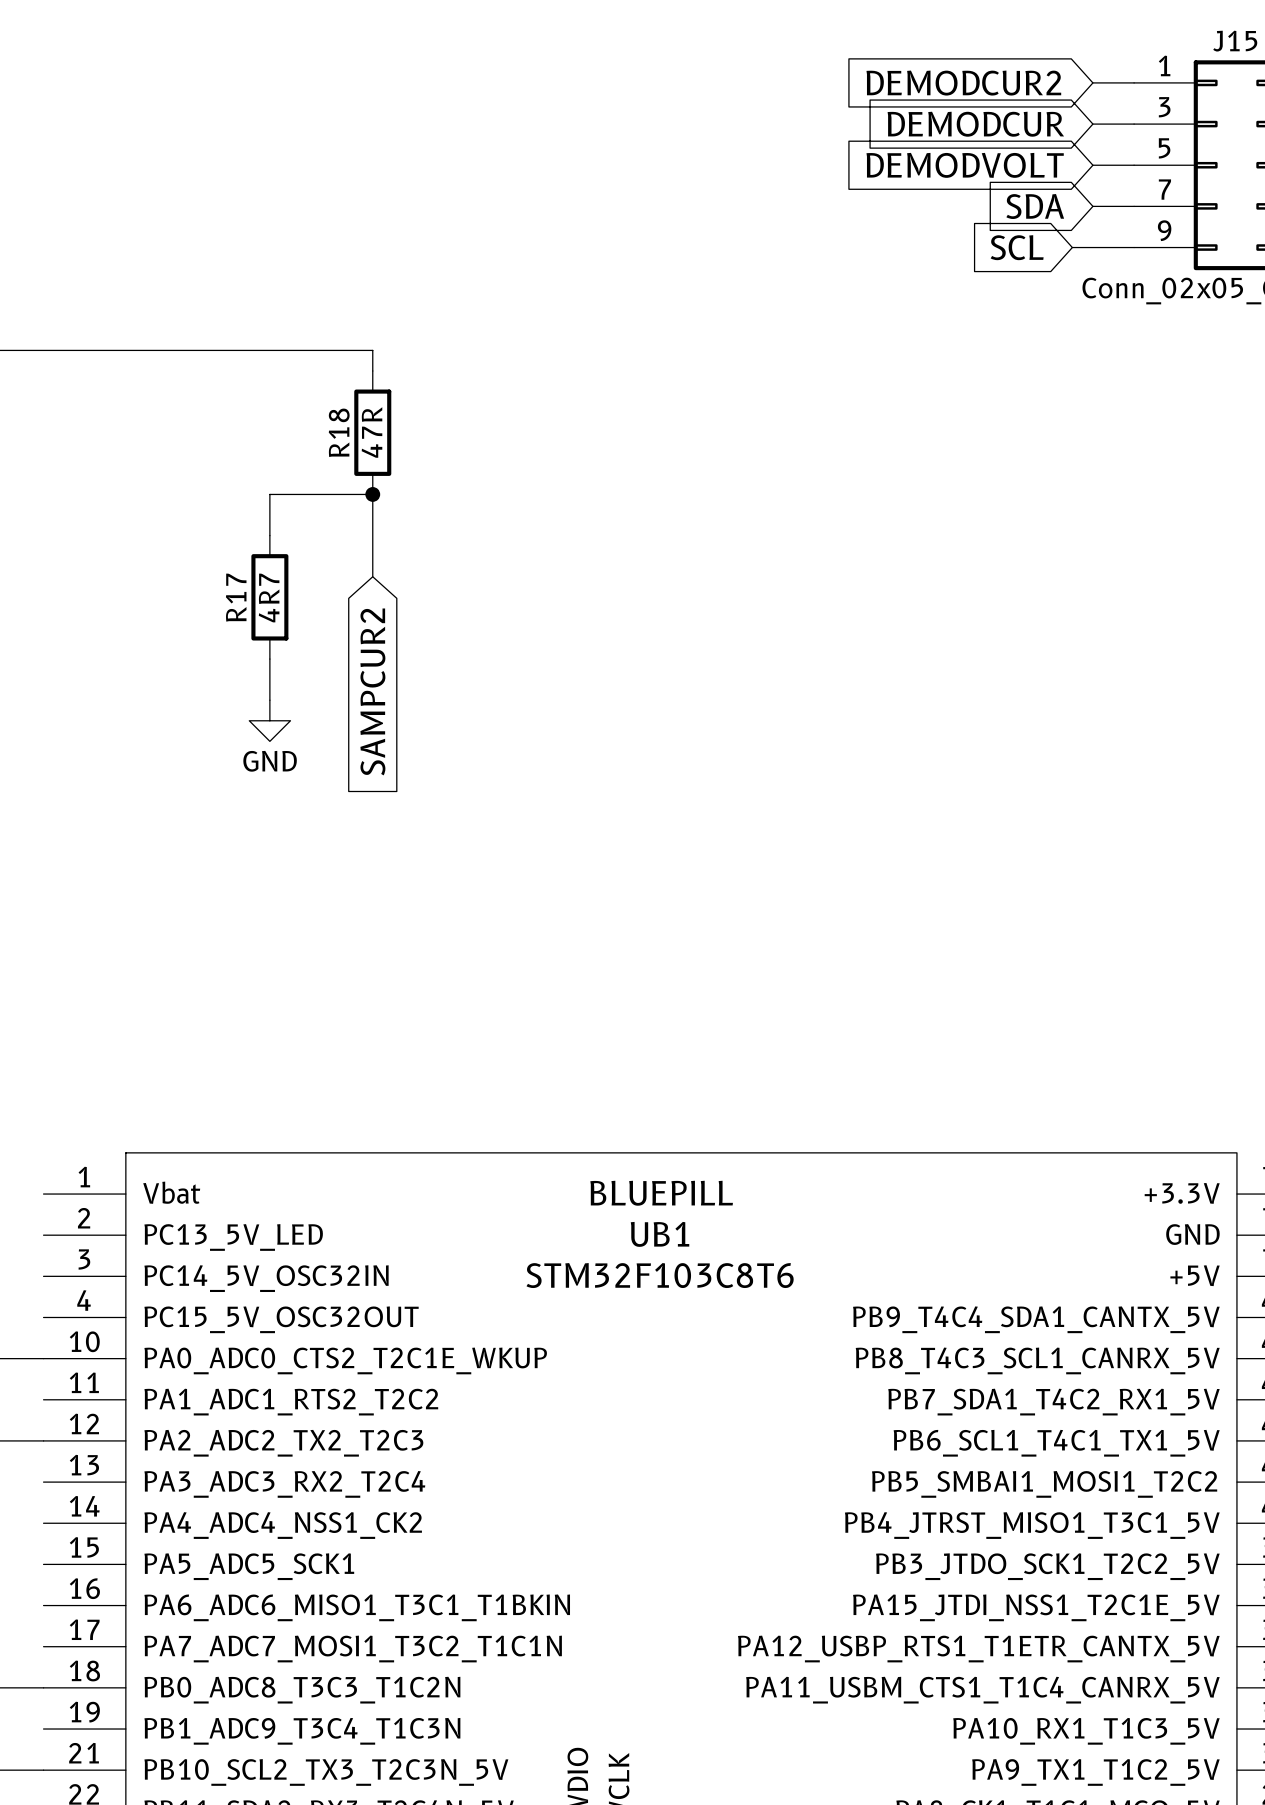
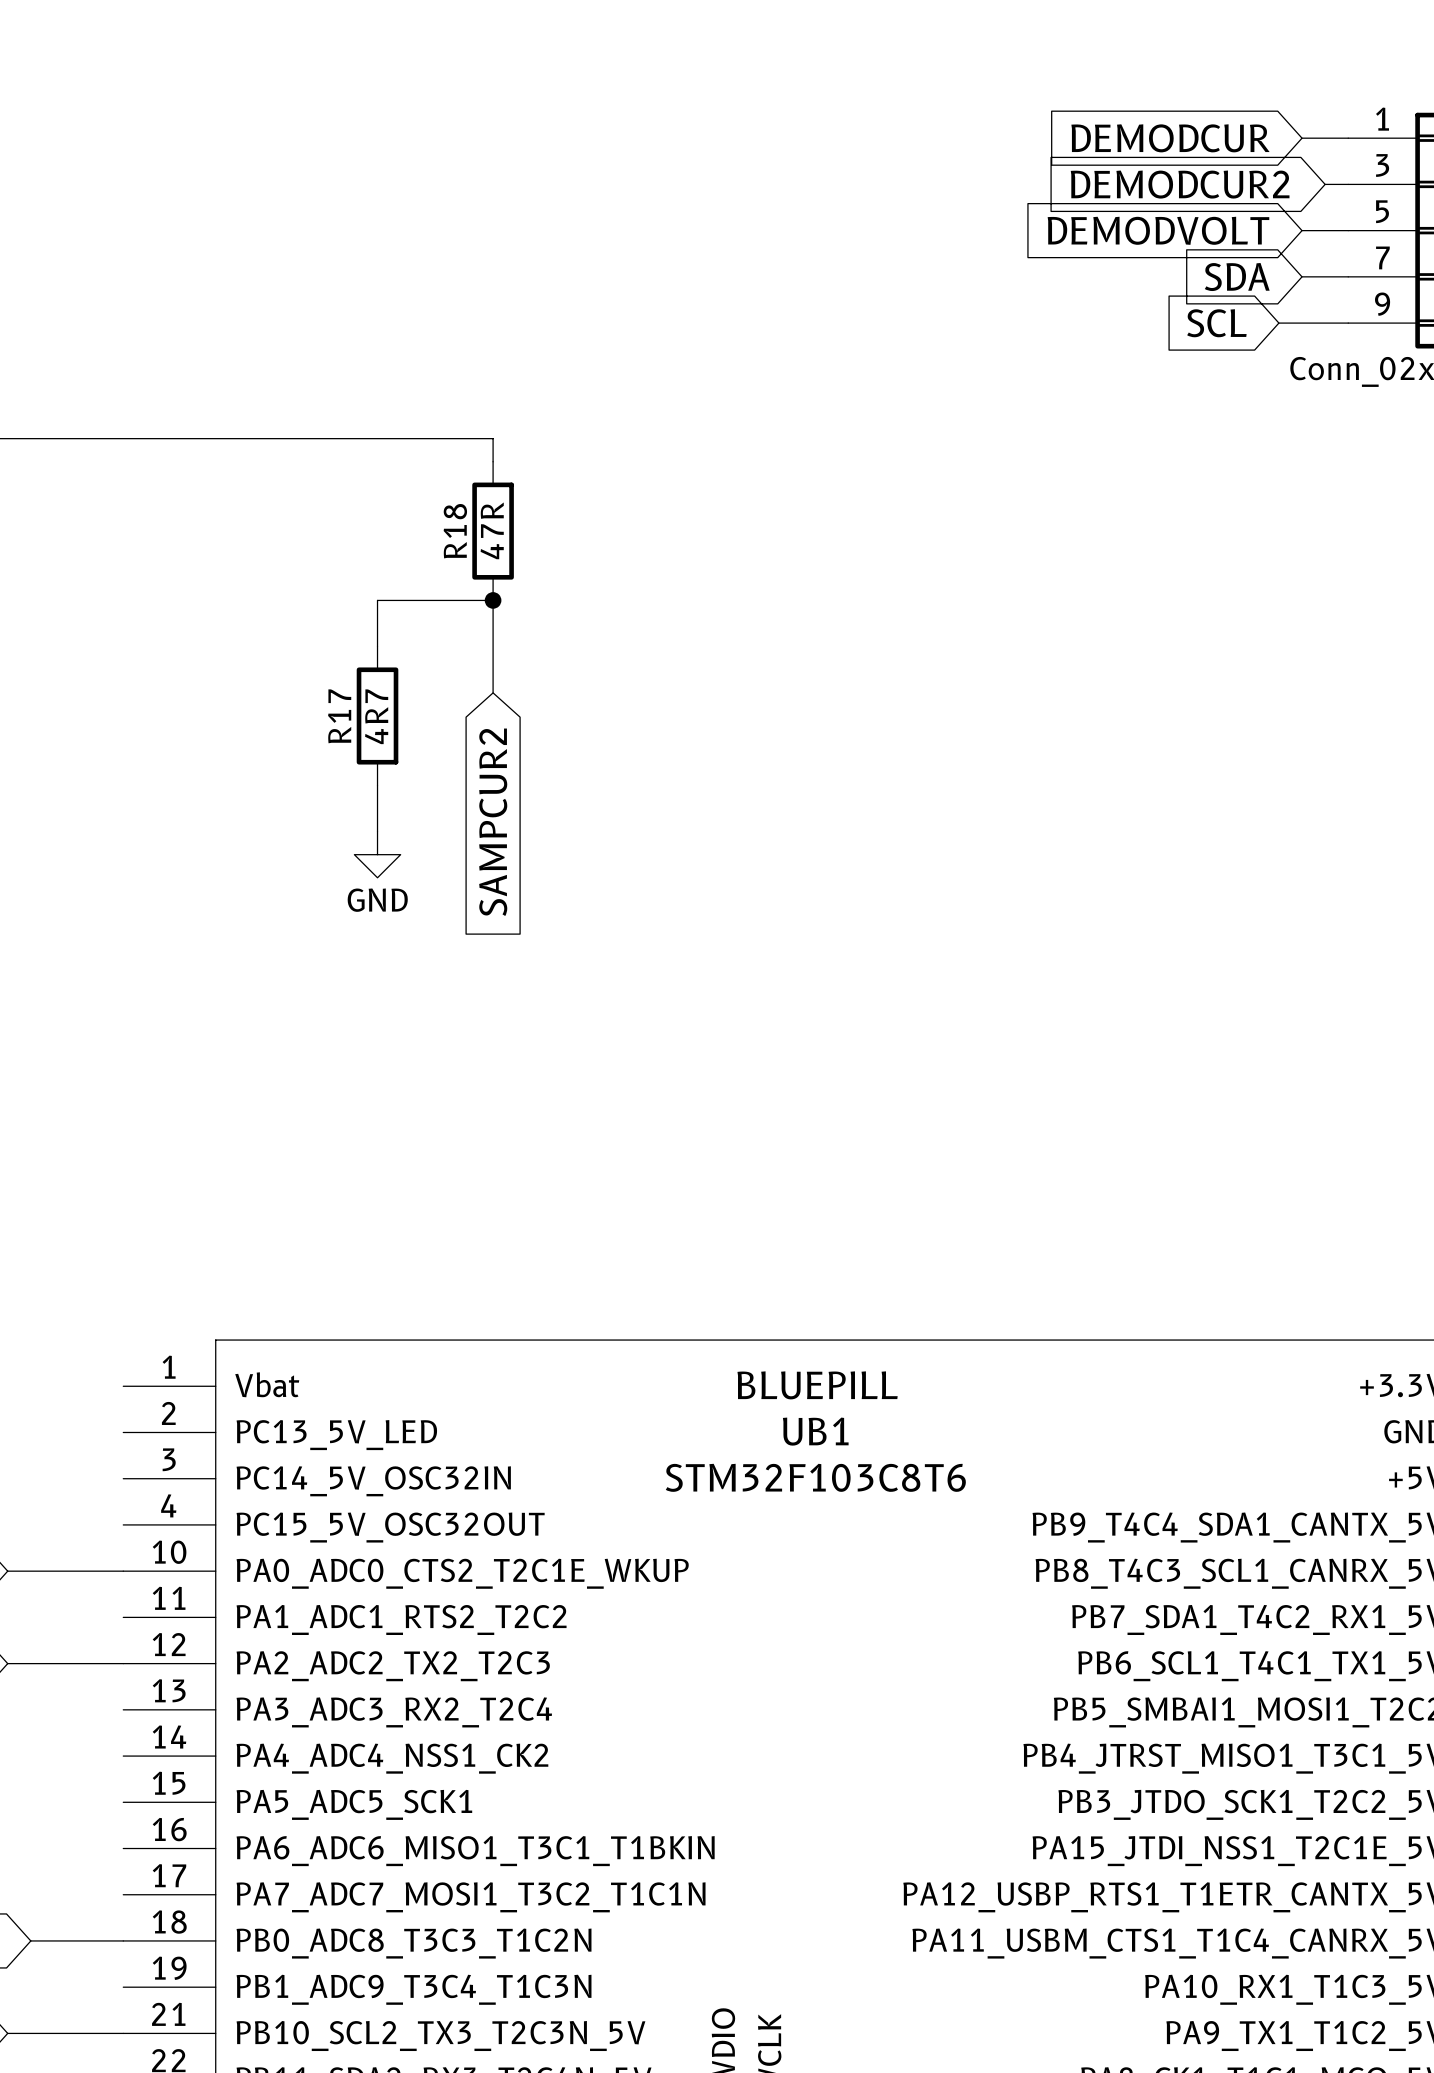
global label: DEMODCUR2 (963, 83) -> DEMODCUR (1170, 138)
global label: DEMODCUR (975, 124) -> DEMODCUR2 (1180, 184)
wire: (1092, 124) (1113, 124) -> none

